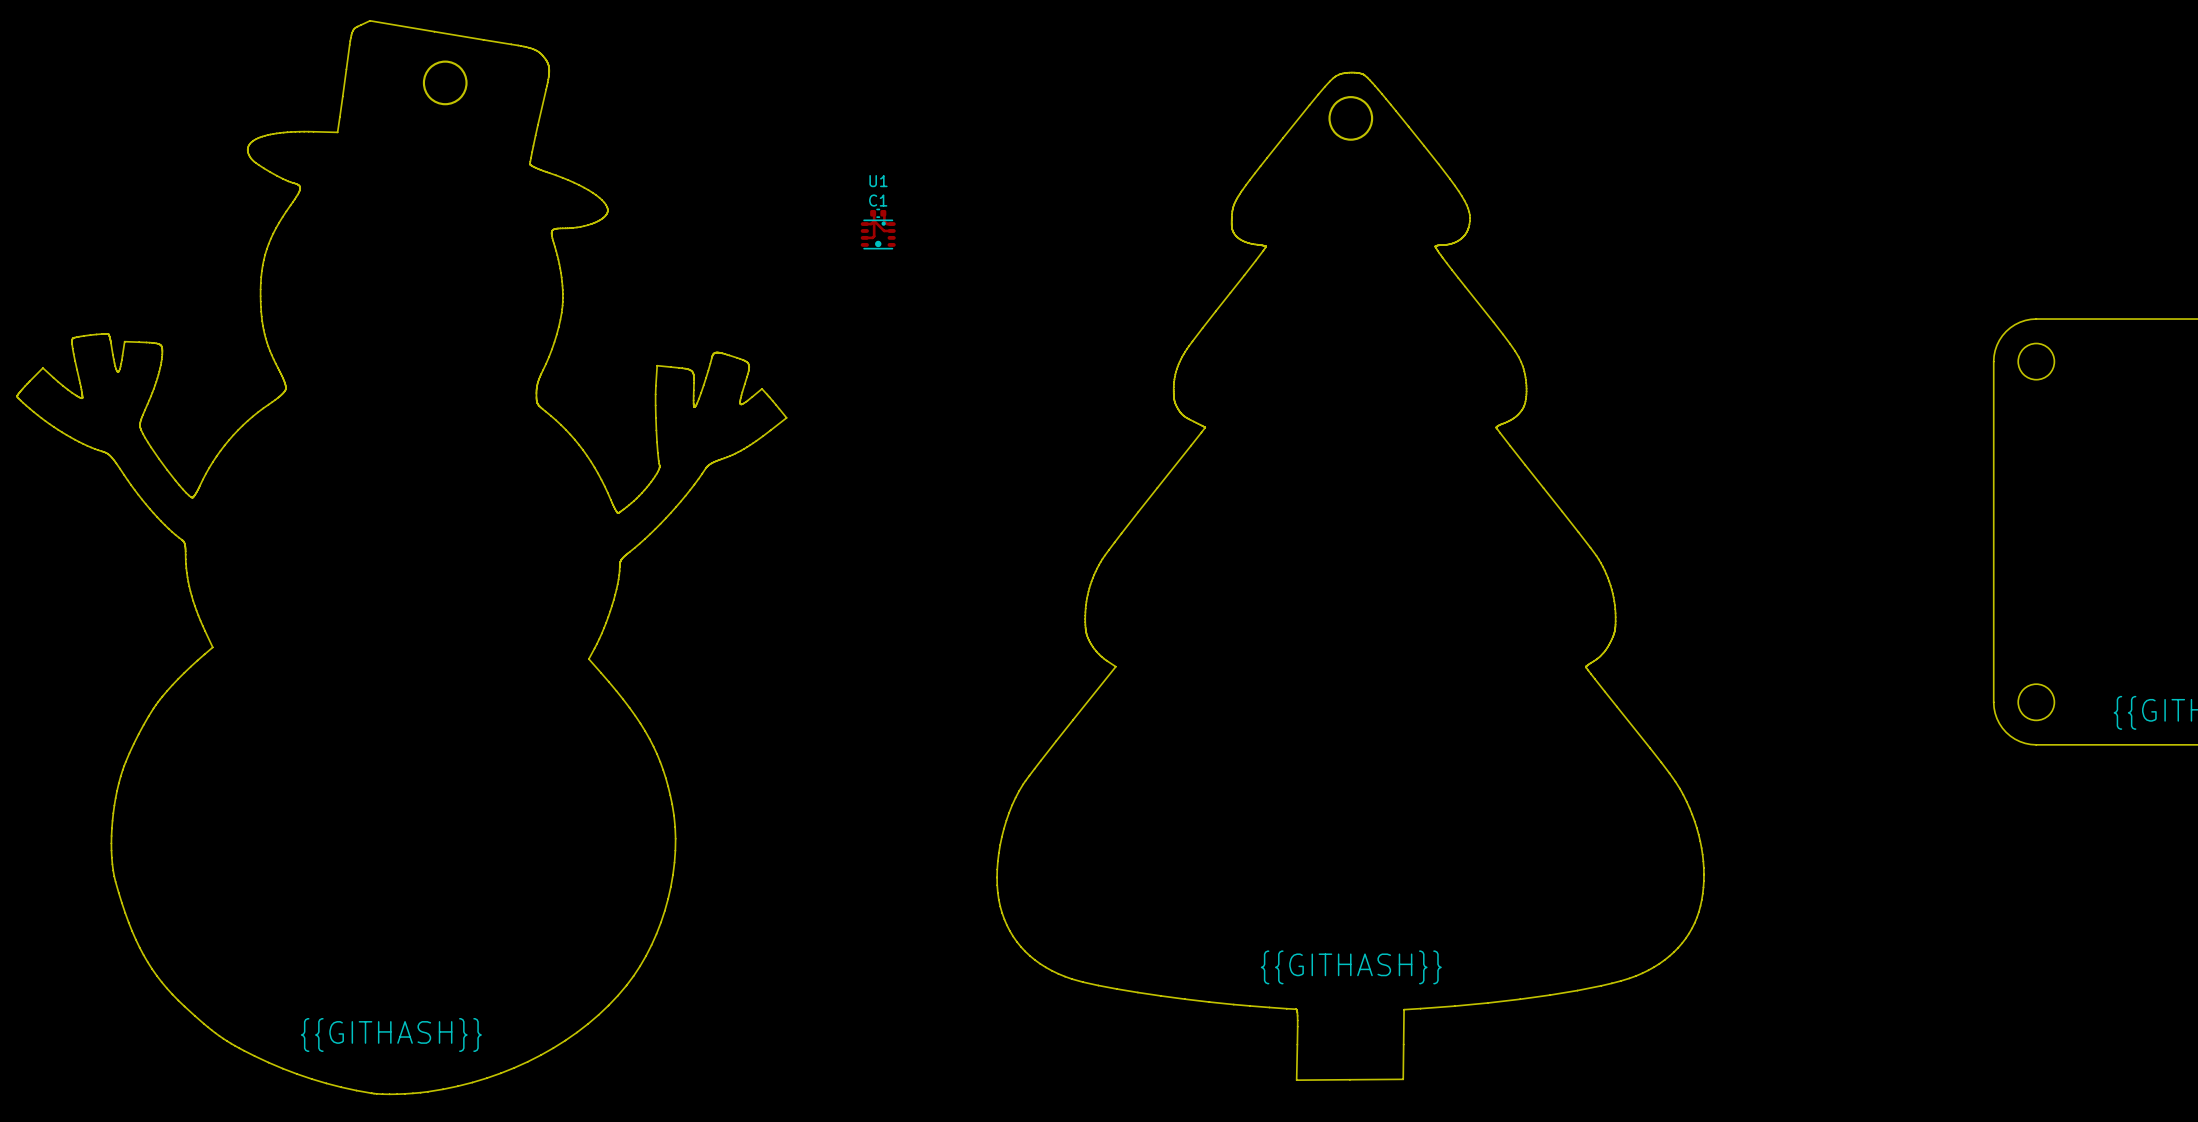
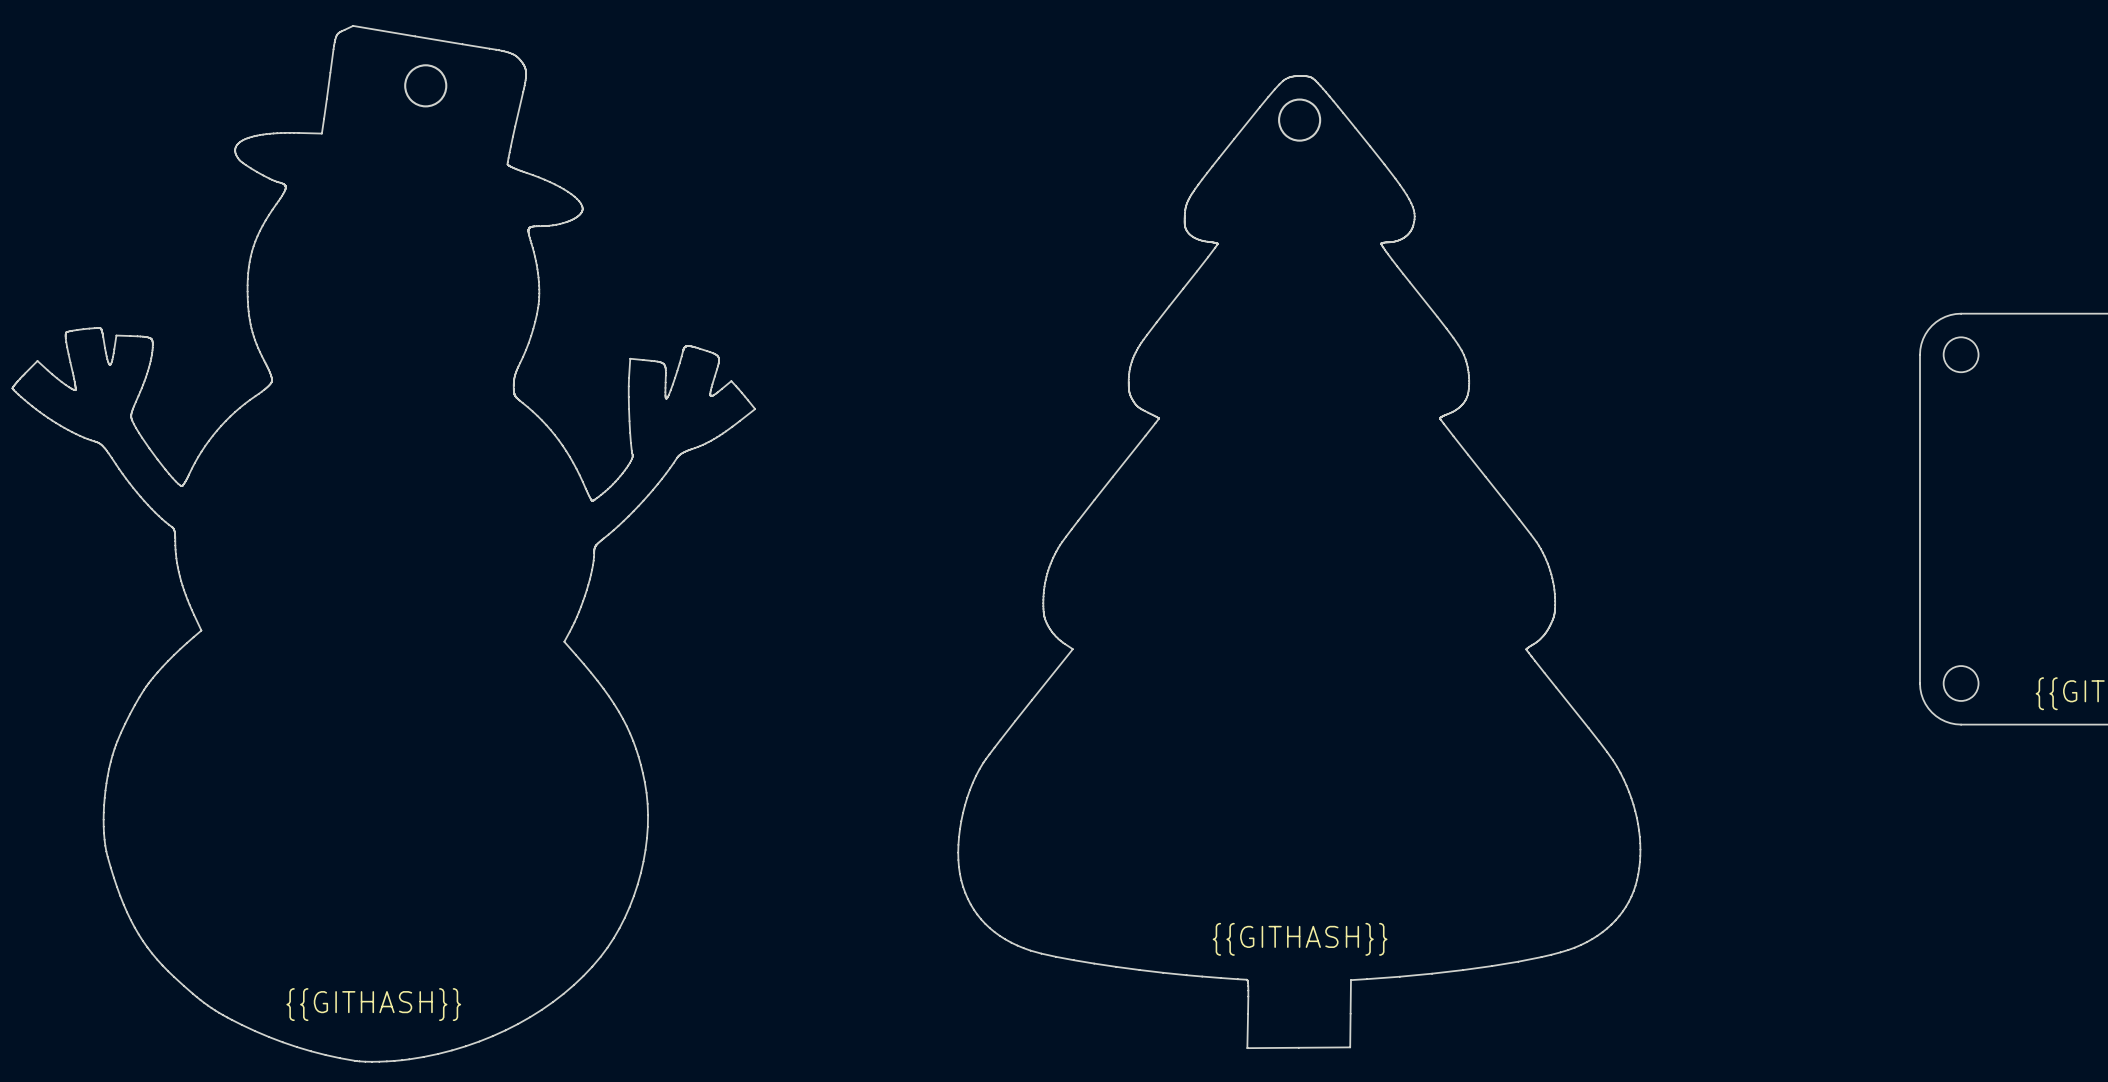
track: (874, 213) (874, 236) (865, 237) -> none
C1: (878, 213) -> none
track: (884, 213) (884, 221) (886, 224) (892, 224) -> none
track: (865, 224) (871, 224) (874, 220) (884, 230) (892, 230) -> none
U1: (878, 234) -> none

